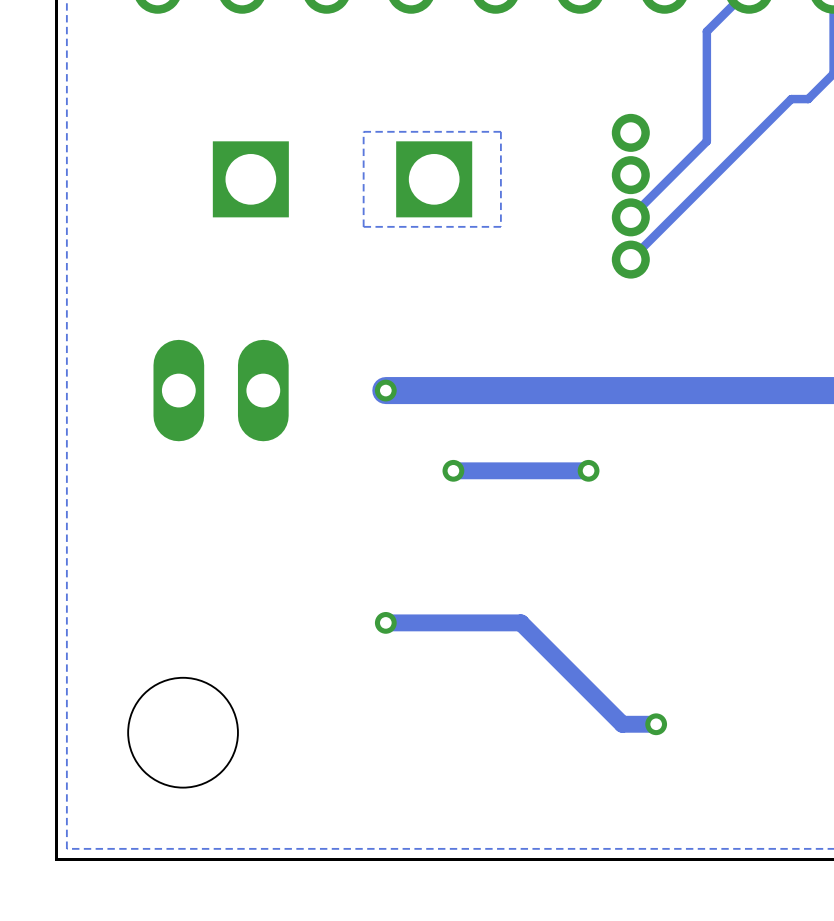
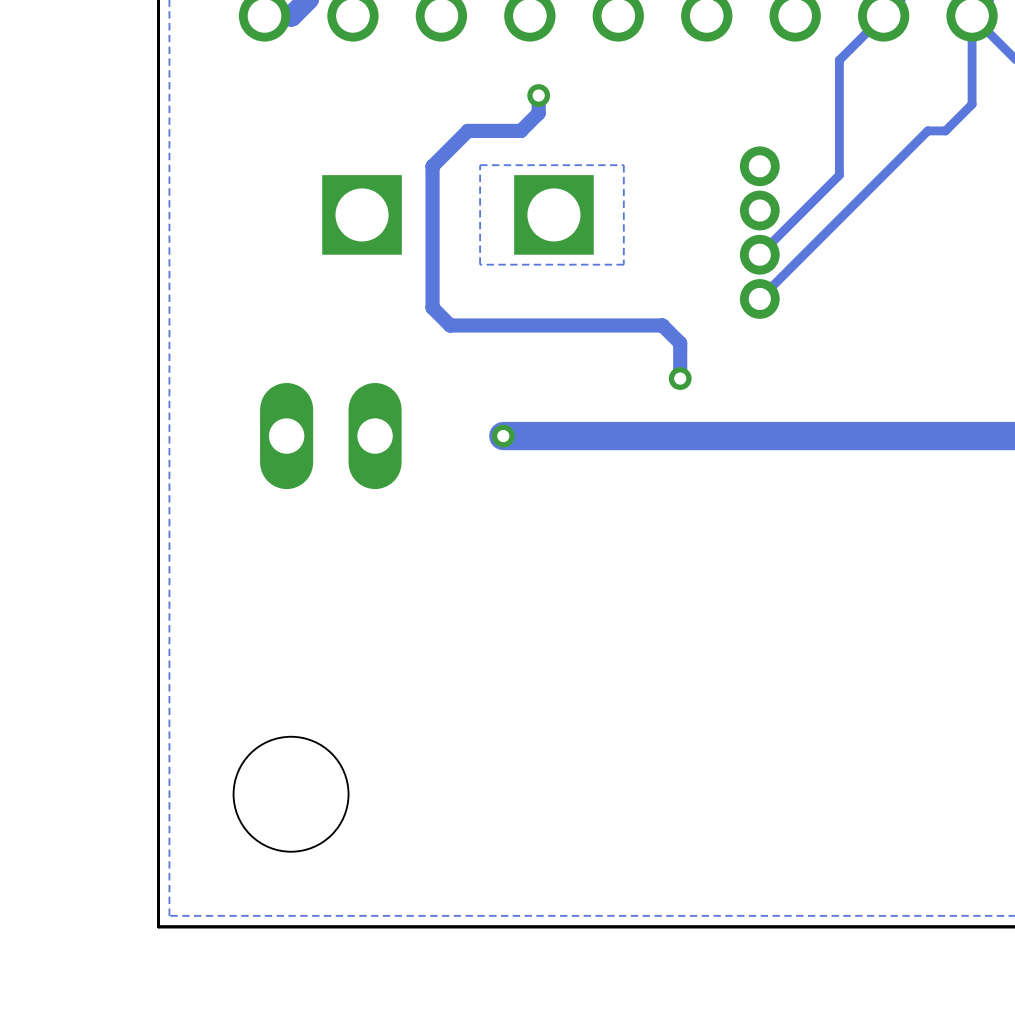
track: none -> (538, 95) (538, 113) (521, 130) (467, 130) (432, 166) (432, 307) (450, 325) (662, 325) (680, 343) (680, 378)
via: none -> (538, 95)
via: none -> (680, 378)
via: (453, 470) -> none
track: (588, 470) (453, 470) -> none
via: (588, 470) -> none
track: (385, 622) (520, 622) (622, 724) (656, 724) -> none
via: (385, 622) -> none
via: (656, 724) -> none

